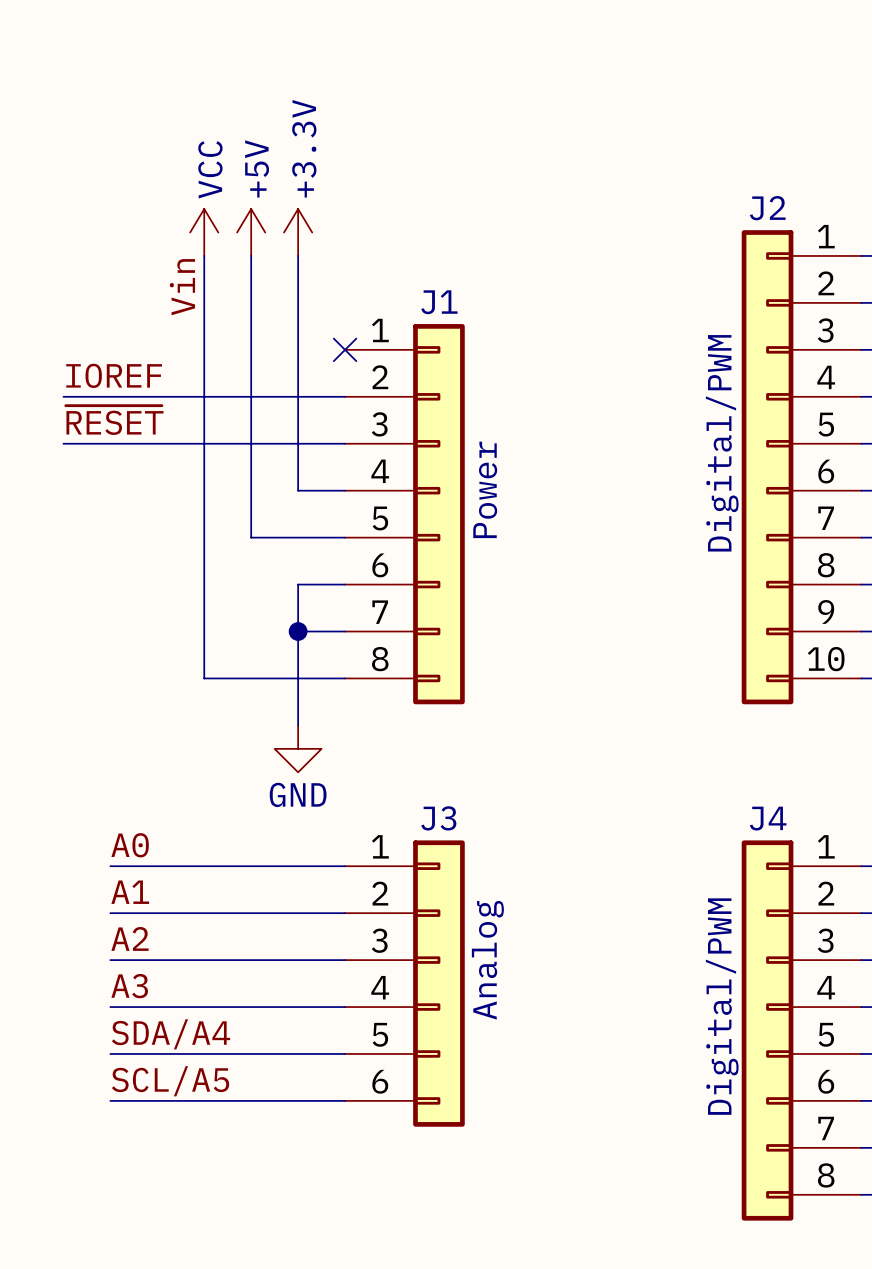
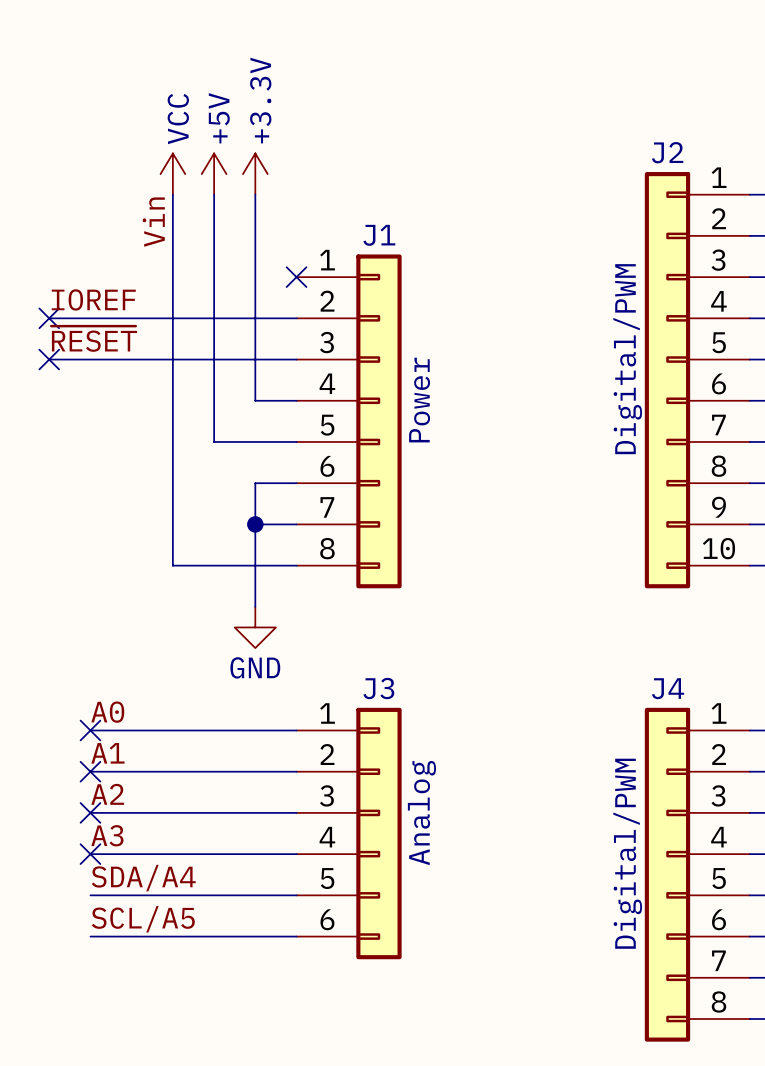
no-connect mark: none -> (49, 318)
no-connect mark: none -> (49, 359)
no-connect mark: none -> (90, 730)
no-connect mark: none -> (90, 771)
no-connect mark: none -> (90, 812)
no-connect mark: none -> (90, 854)

